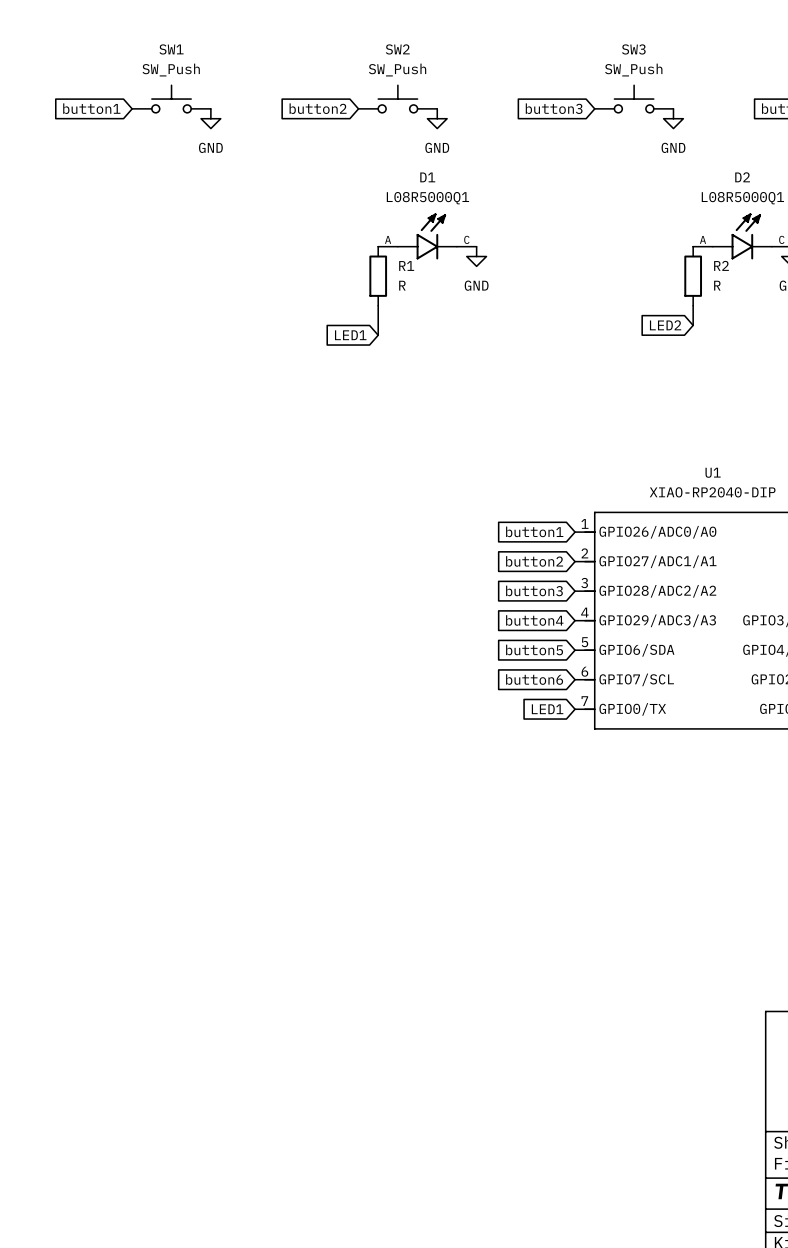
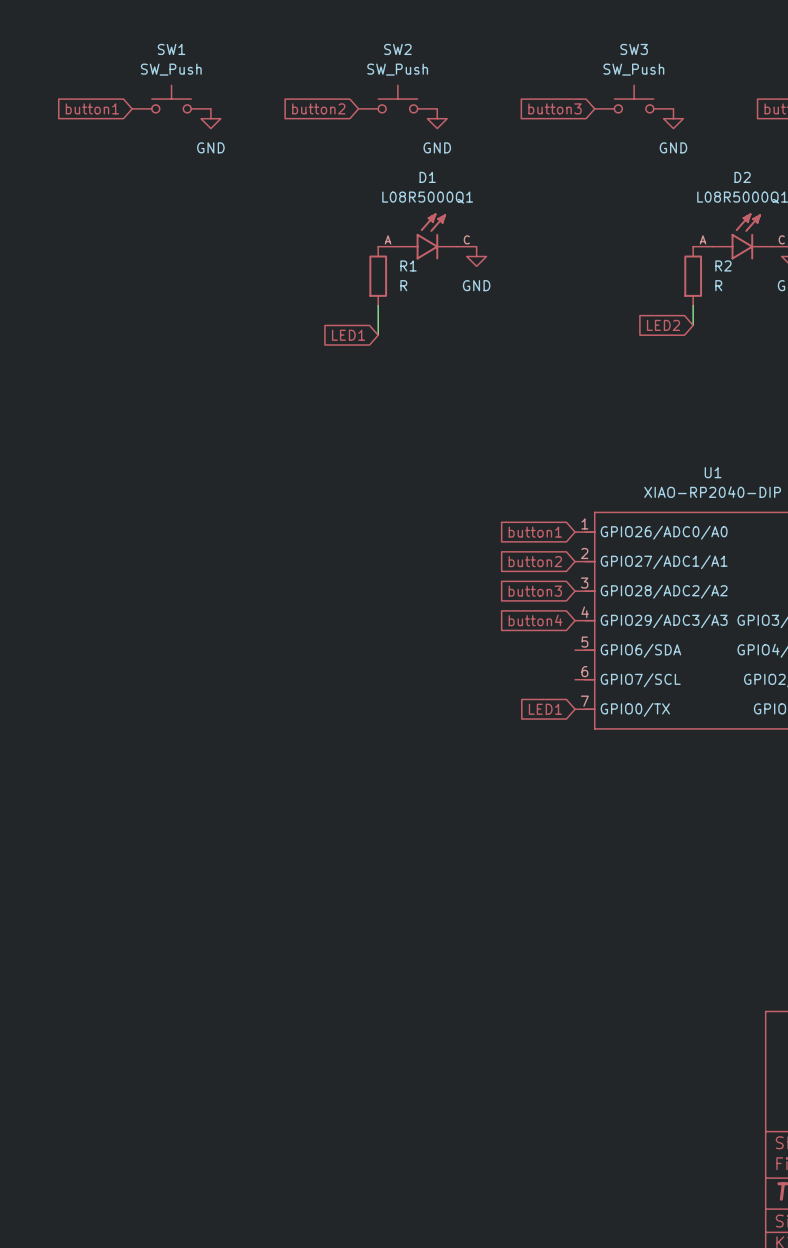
global label: button5 (534, 649) -> none
global label: button6 (534, 679) -> none

